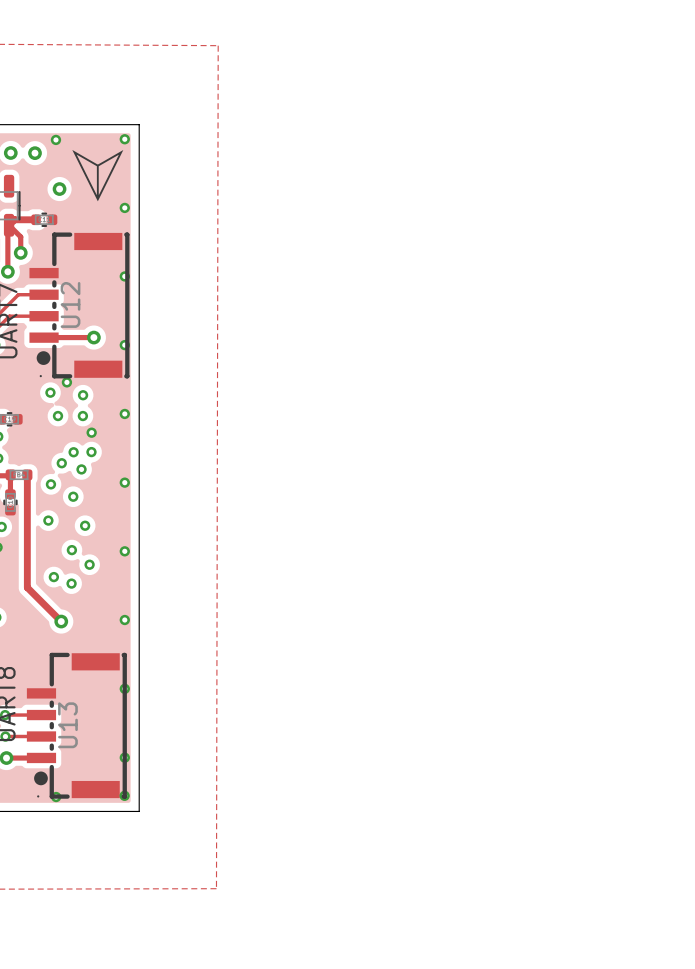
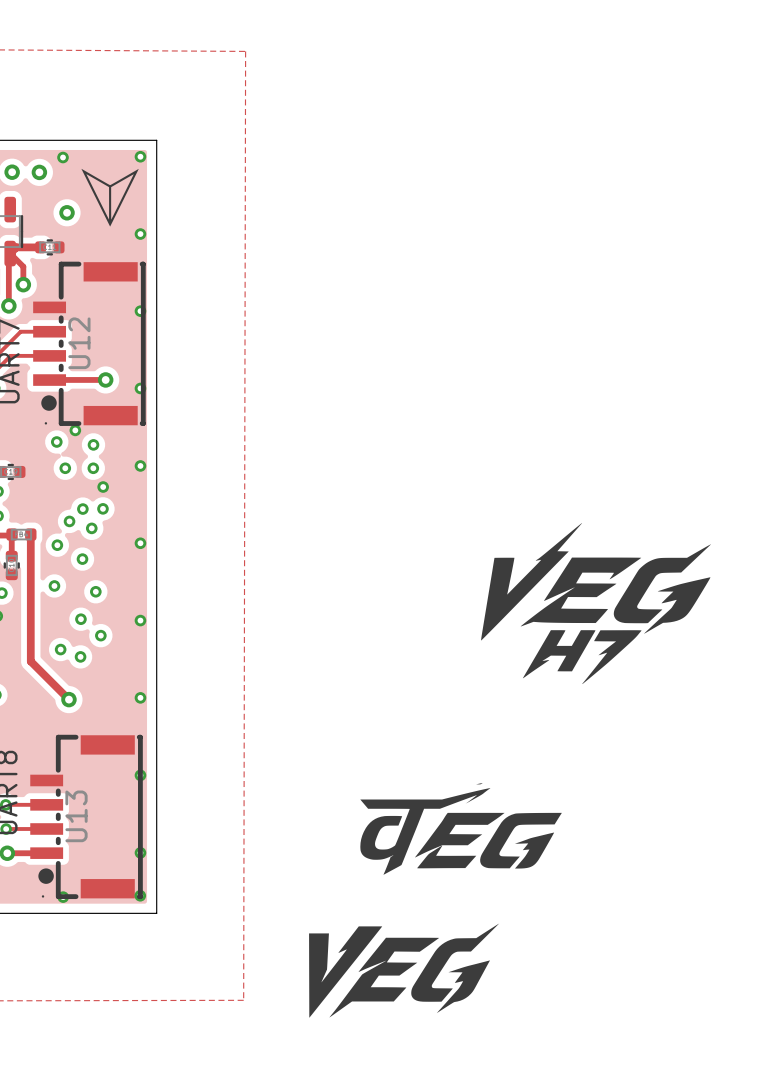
drawing: none -> [481, 523, 711, 685]
drawing: none -> [360, 782, 562, 875]
drawing: none -> [309, 923, 500, 1018]

